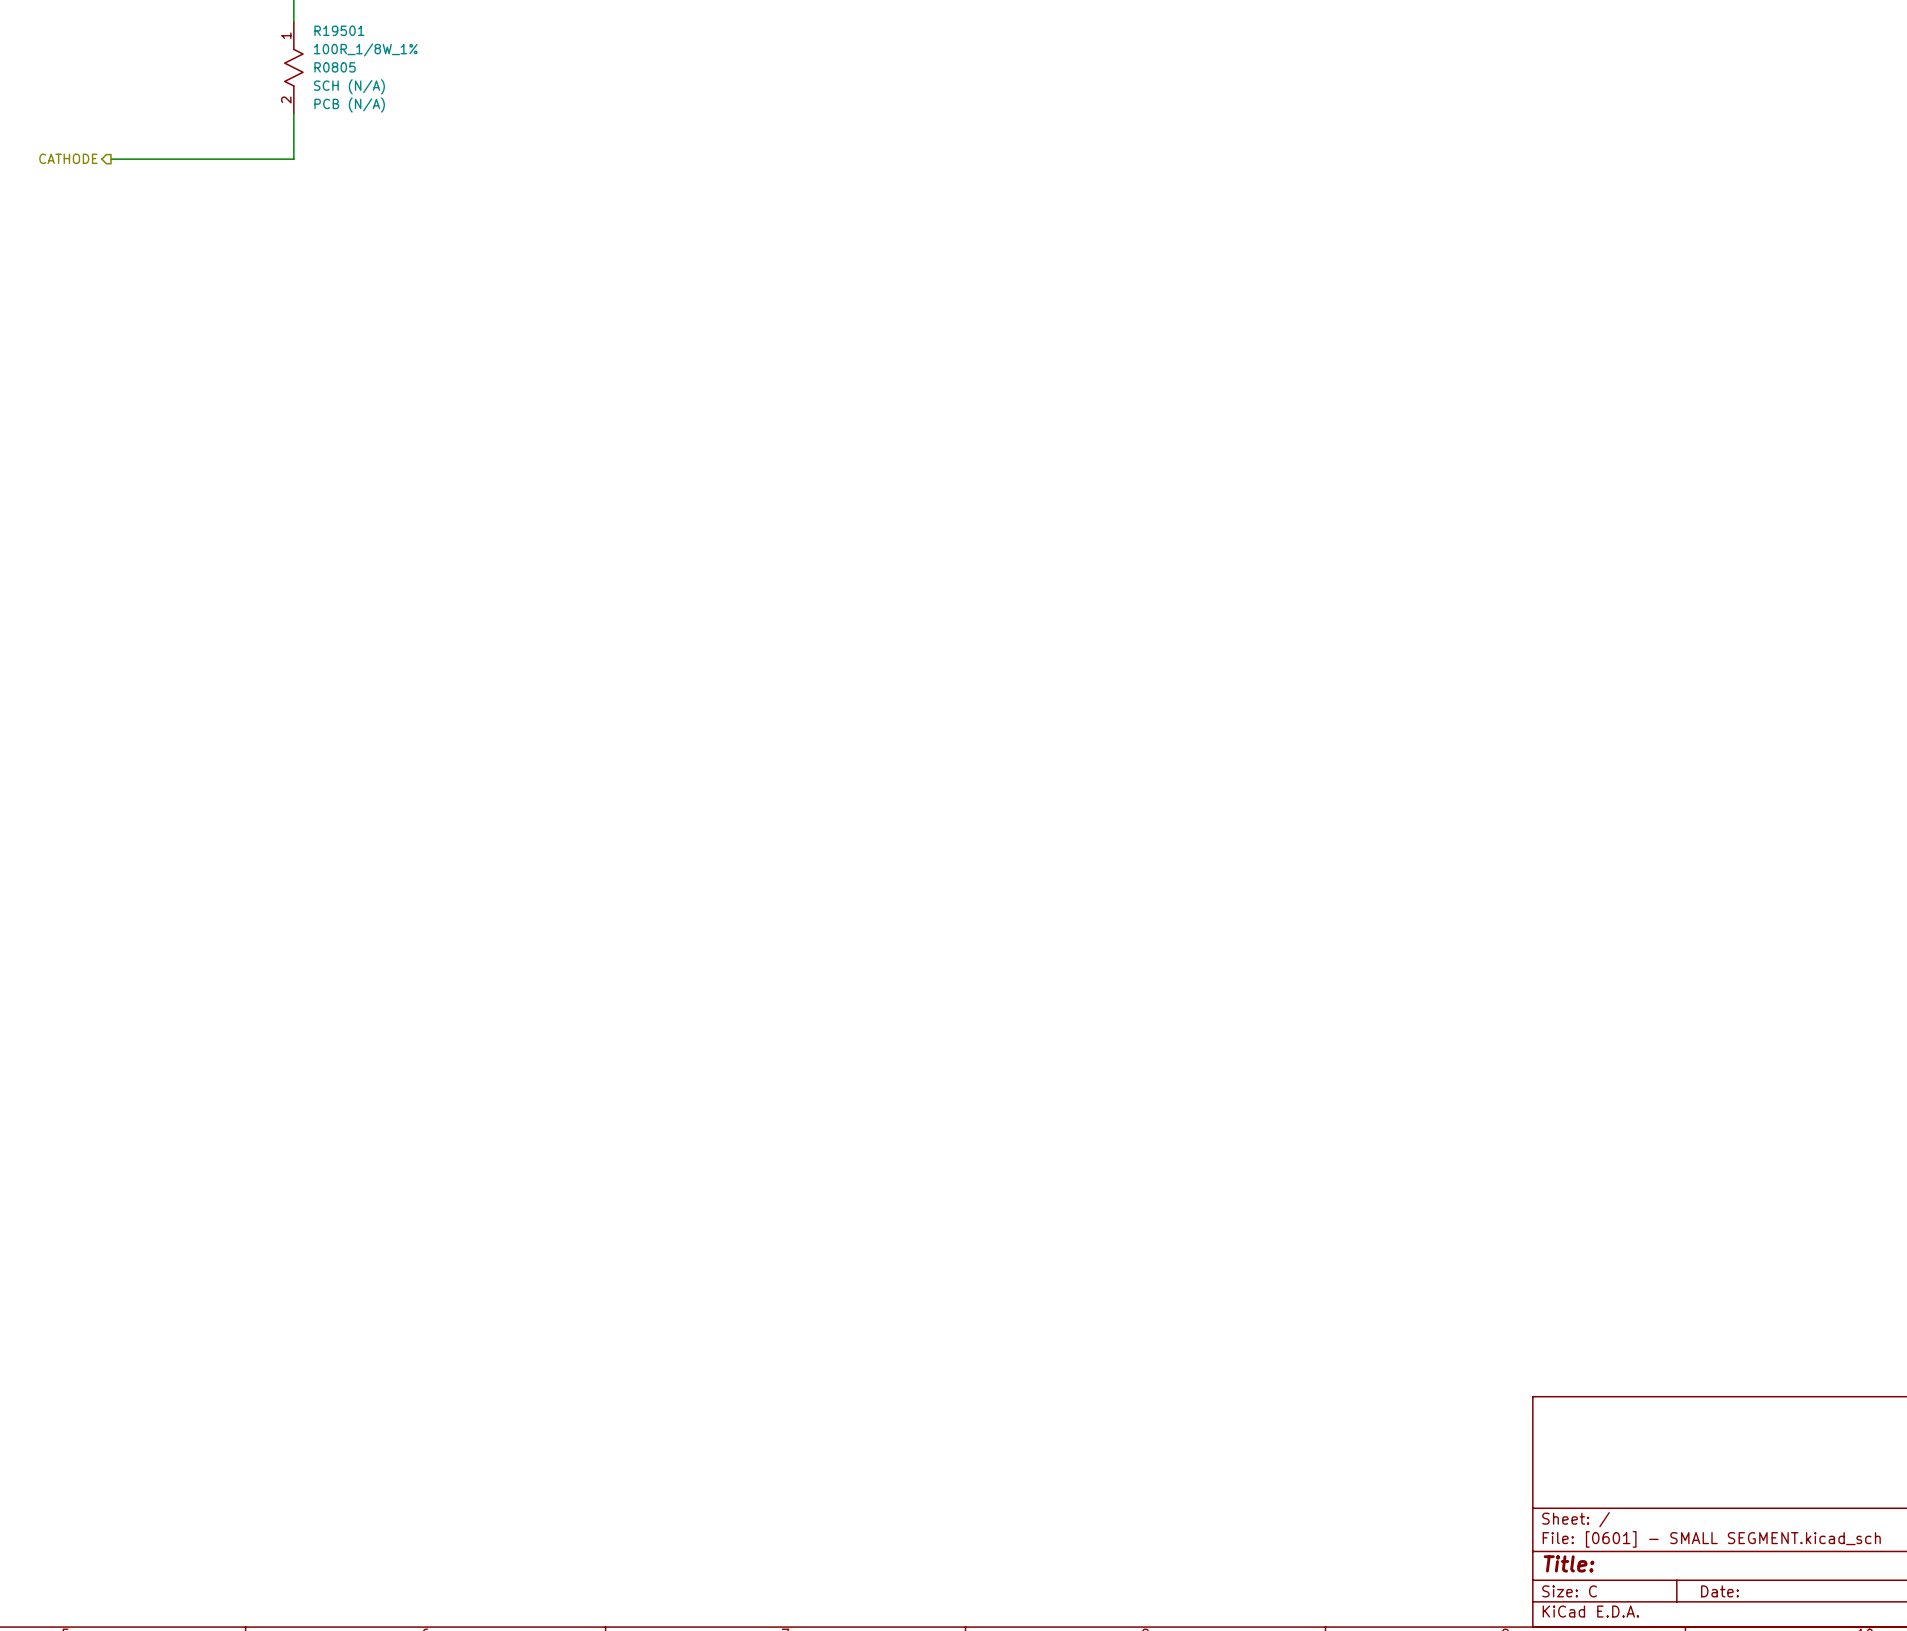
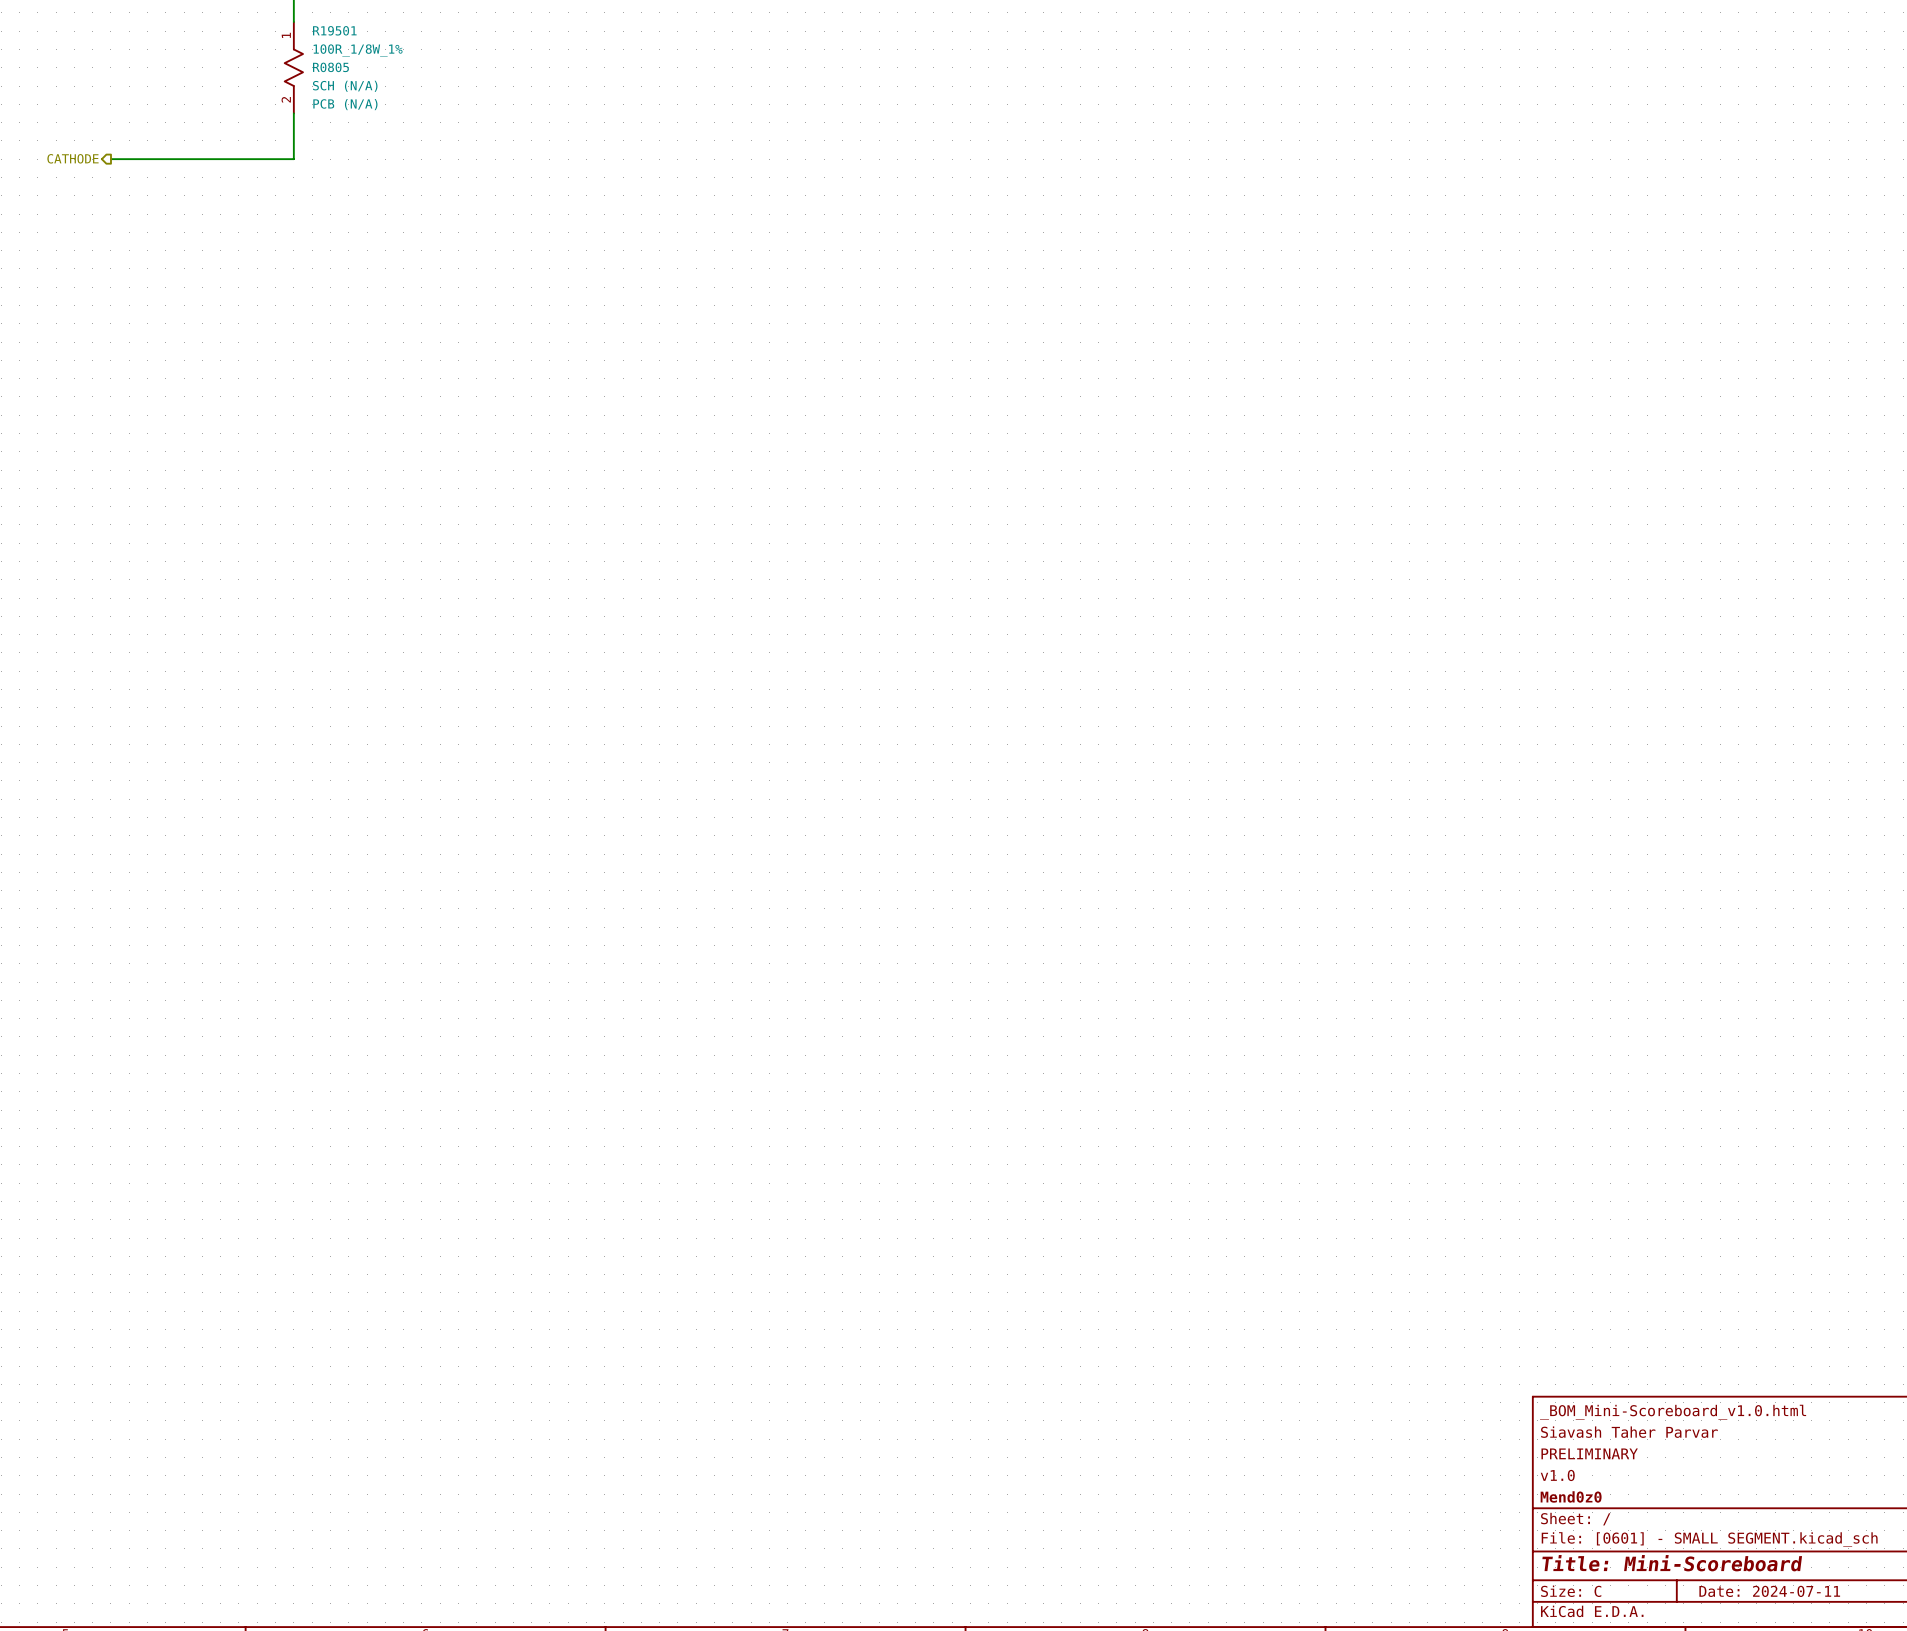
title block: none -> _BOM_Mini-Scoreboard_v1.0.html (1673, 1412)
title block: none -> Siavash Taher Parvar (1629, 1432)
title block: none -> PRELIMINARY (1589, 1453)
title block: none -> v1.0 (1557, 1475)
title block: none -> Mend0z0 (1571, 1496)
title block: Title: (1569, 1563) -> Title: Mini-Scoreboard (1672, 1563)
title block: Date: (1719, 1591) -> Date: 2024-07-11 (1769, 1591)

